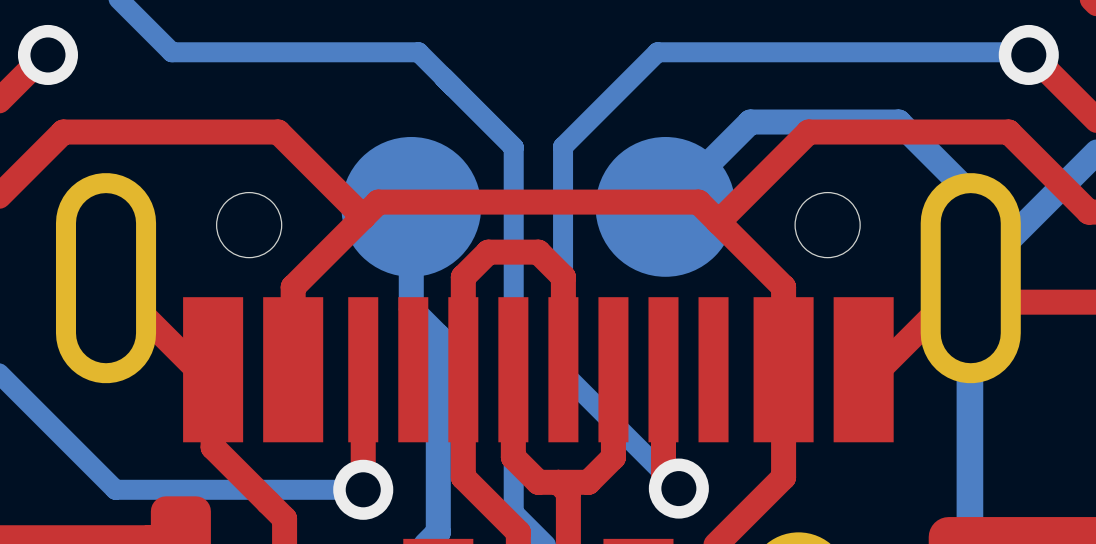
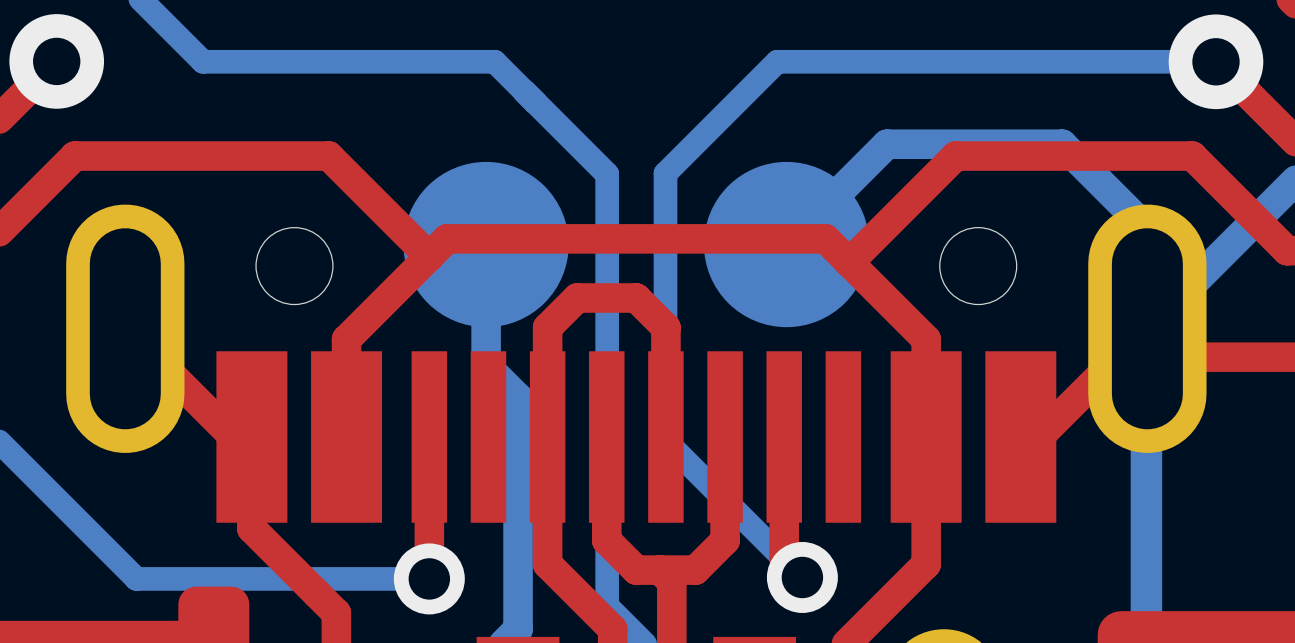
via size: [17, 24, 79, 85] -> [9, 14, 105, 109]
via size: [998, 24, 1059, 85] -> [1168, 14, 1264, 110]

